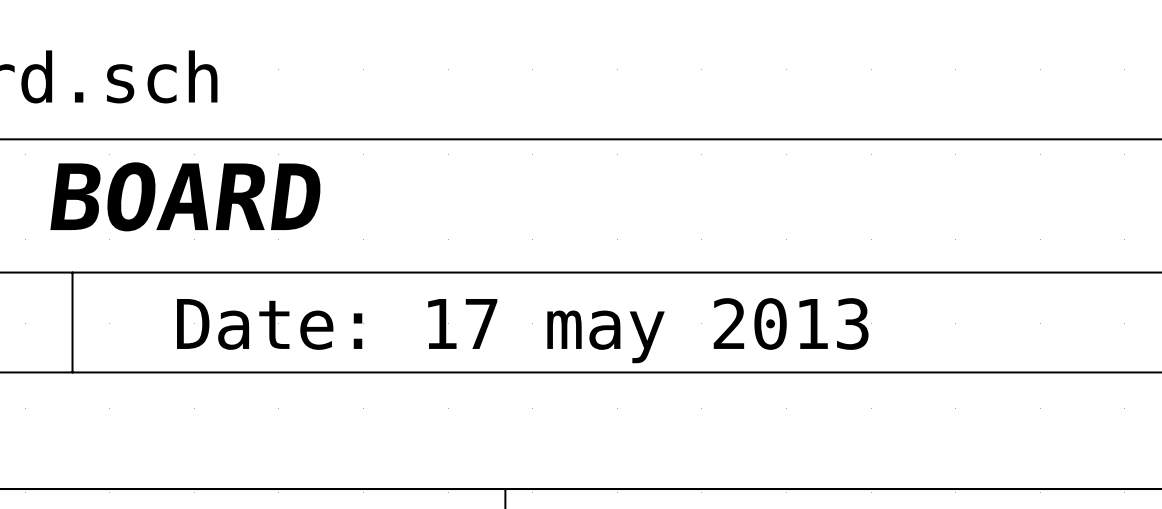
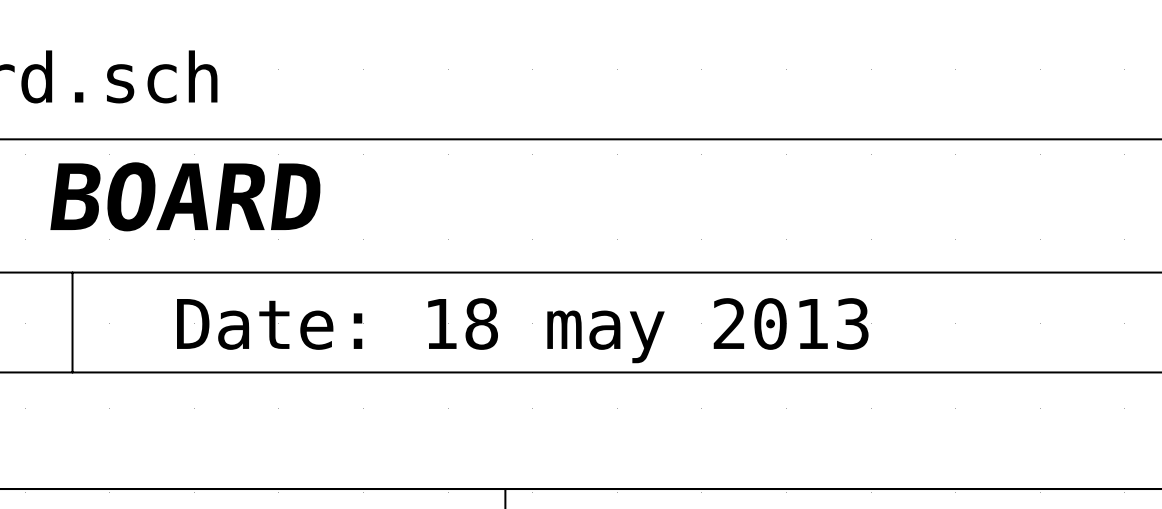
title block: Date: 17 may 2013 (522, 330) -> Date: 18 may 2013 (522, 330)

